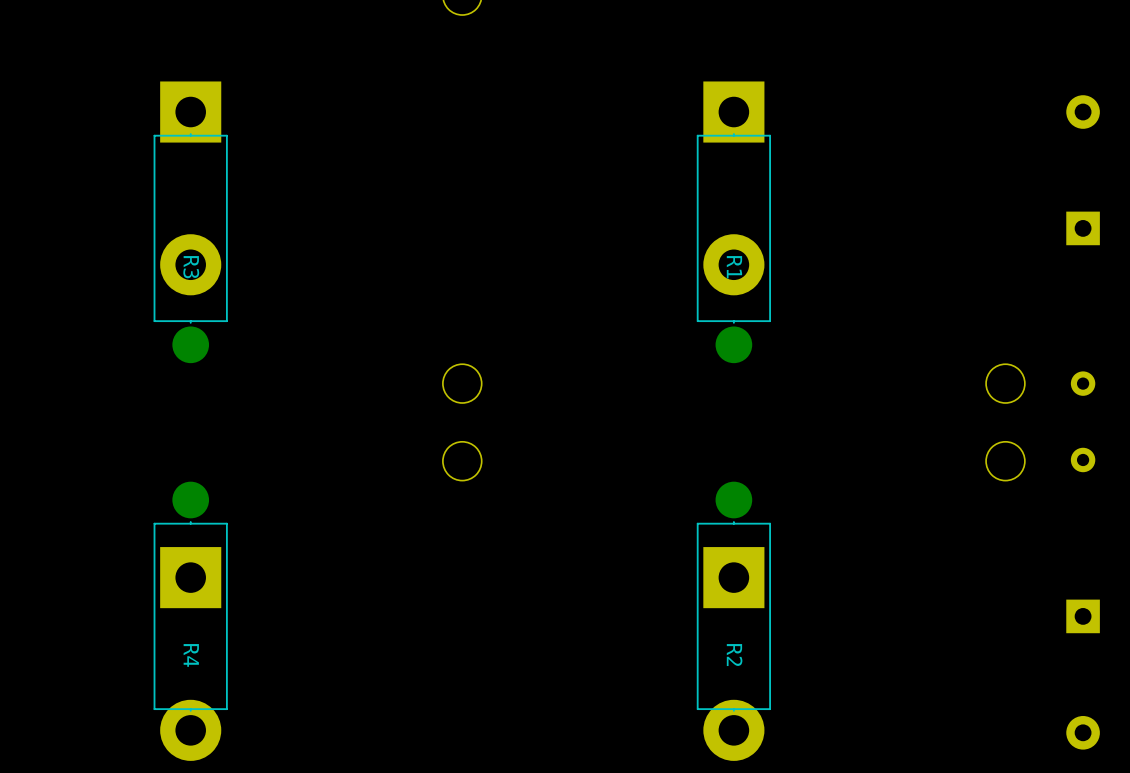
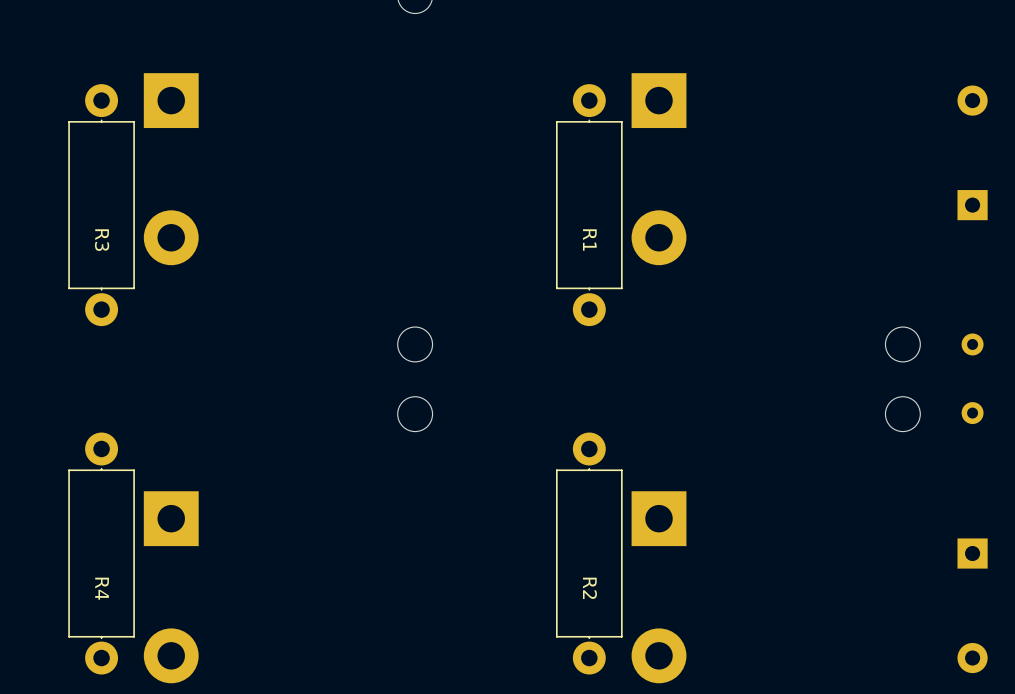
R3 footprint: [153, 93, 228, 364] -> [68, 84, 135, 327]
R1 footprint: [696, 93, 772, 364] -> [556, 84, 623, 327]
R4 footprint: [153, 481, 228, 752] -> [68, 432, 135, 675]
R2 footprint: [696, 481, 772, 752] -> [556, 432, 623, 675]

